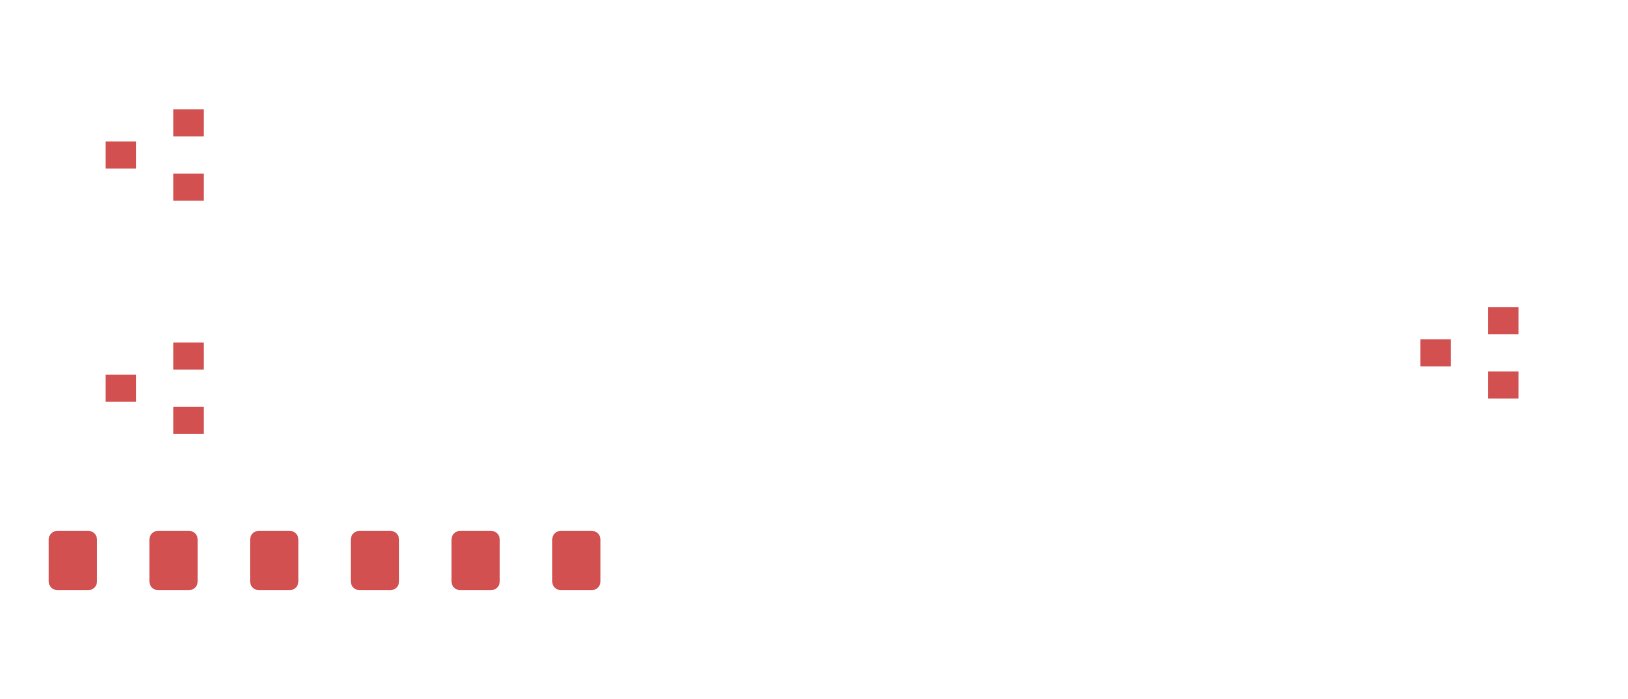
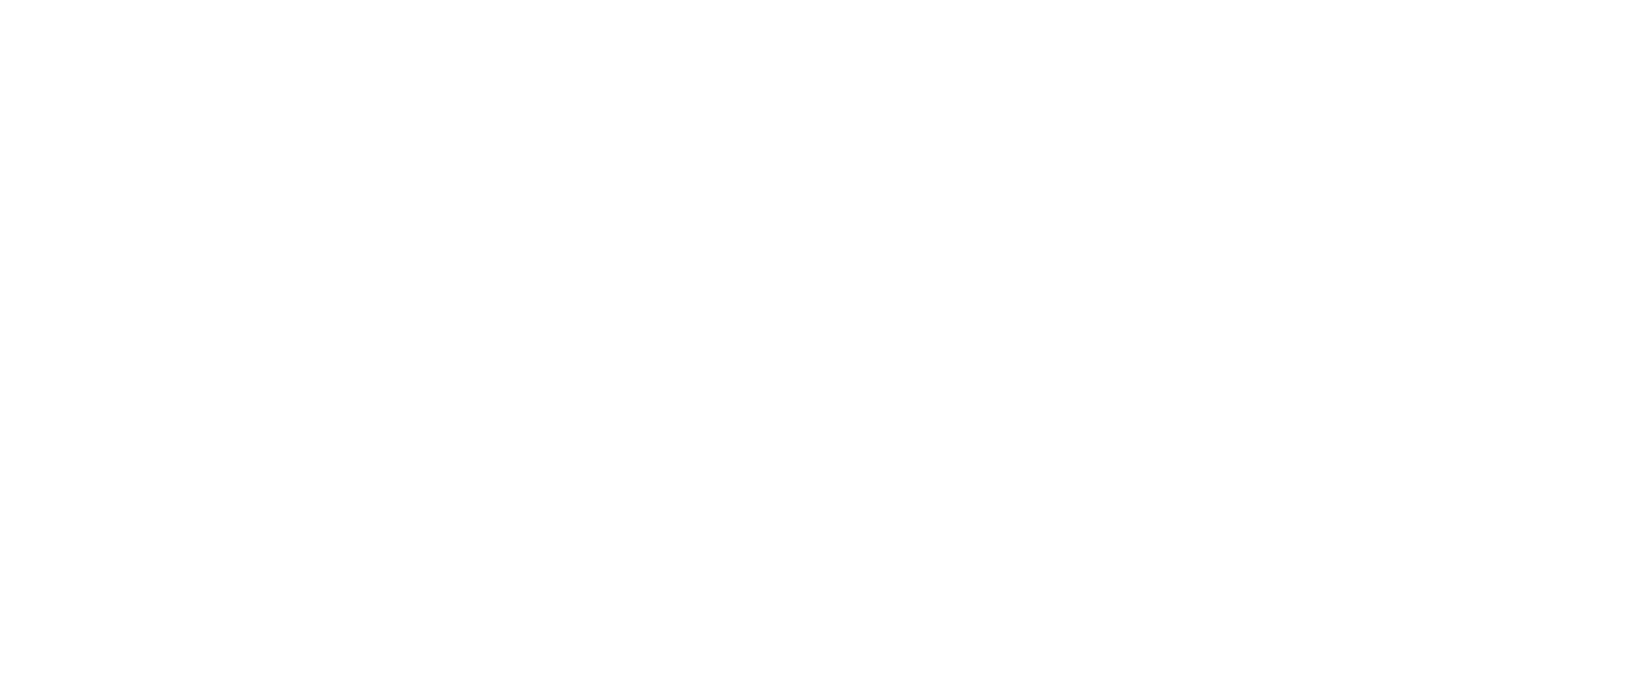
part: (154, 155) -> none
part: (1469, 352) -> none
part: (154, 388) -> none
part: (123, 560) -> none
part: (324, 560) -> none
part: (525, 560) -> none

